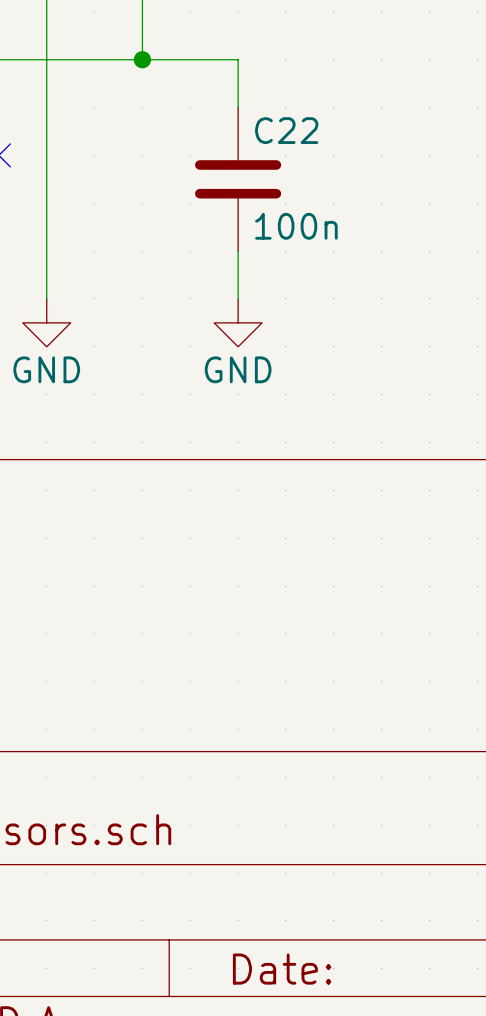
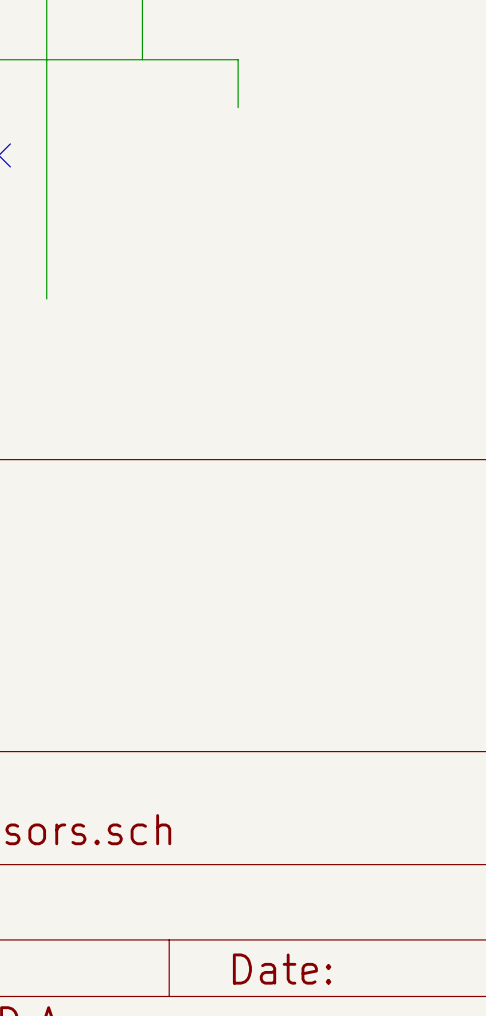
junction: (142, 59) -> none
C22: 100n (238, 179) -> none
wire: (238, 251) (238, 298) -> none
power symbol: GND (46, 322) -> none
power symbol: GND (238, 322) -> none

